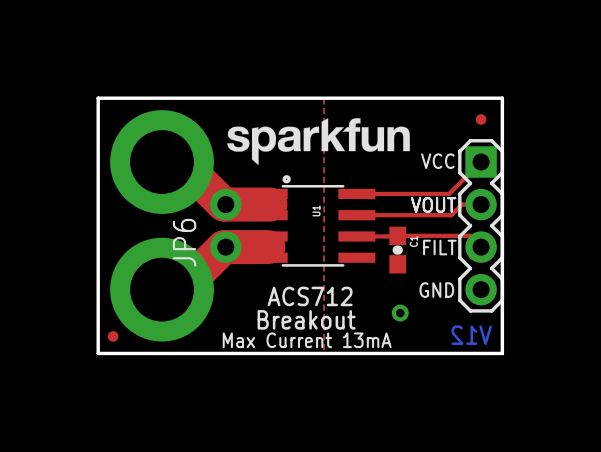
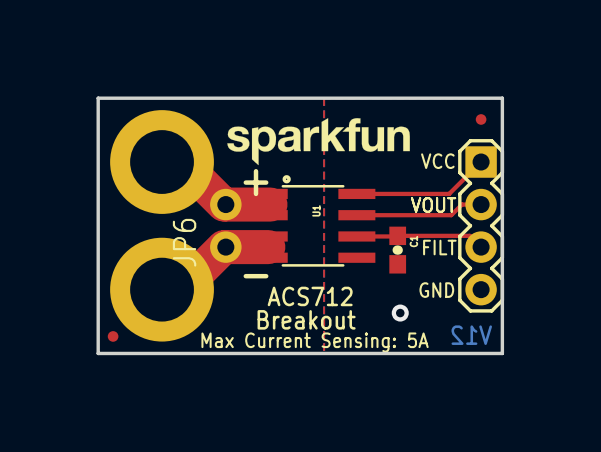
text: none -> + (256, 182)
text: none -> - (256, 276)
text: Max Current 13mA (307, 340) -> Max Current Sensing: 5A (315, 342)

